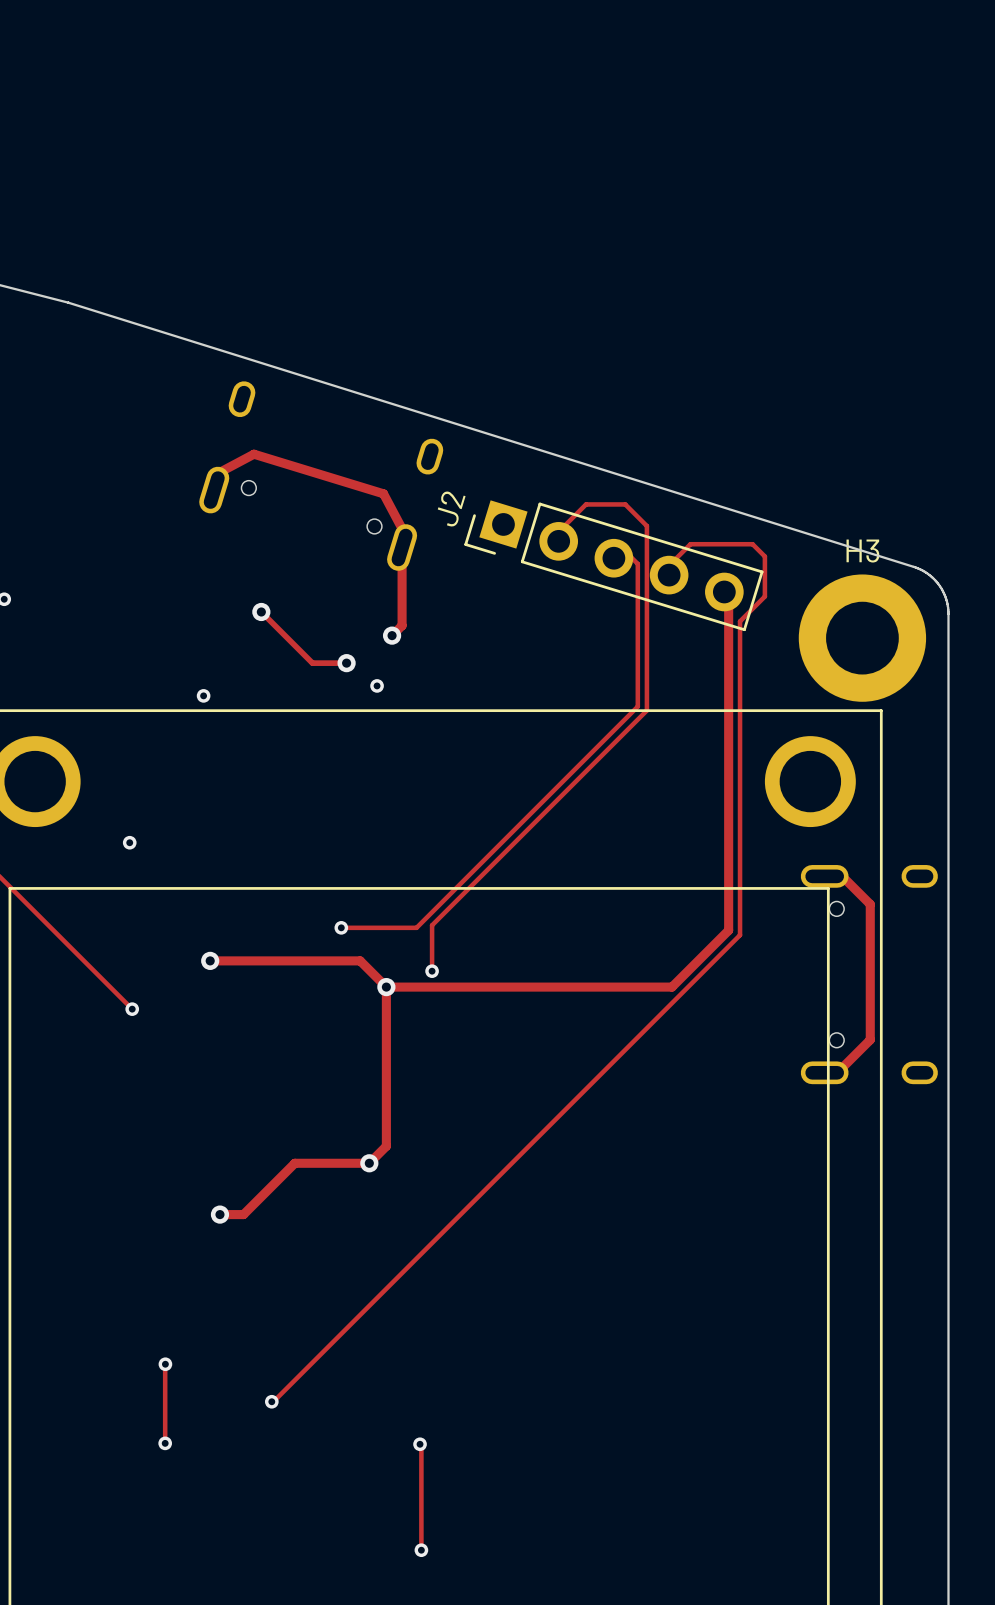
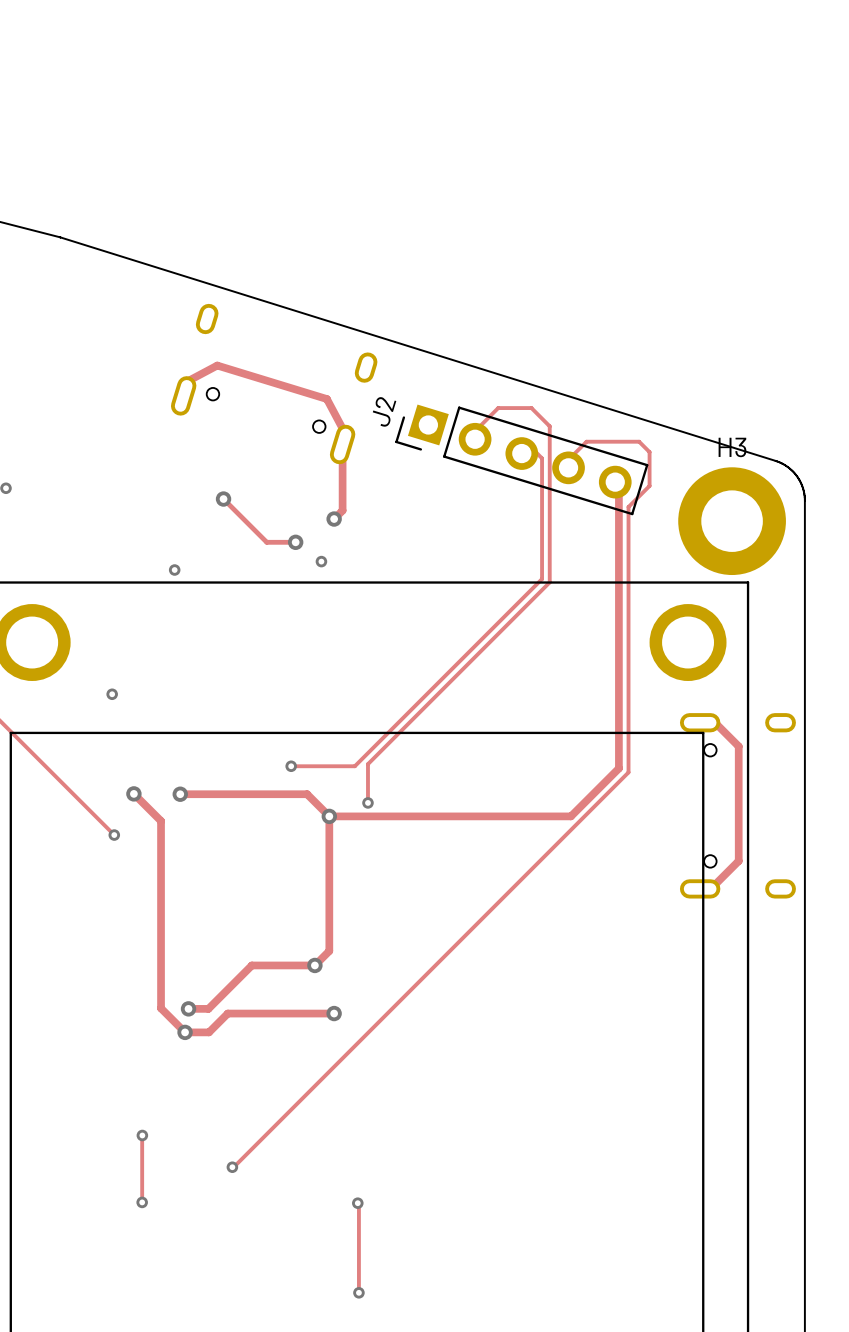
track: none -> (133, 793) (161, 821) (161, 1008) (185, 1032) (208, 1032) (227, 1013) (334, 1013)
via: none -> (133, 793)
via: none -> (334, 1013)
via: none -> (185, 1032)

